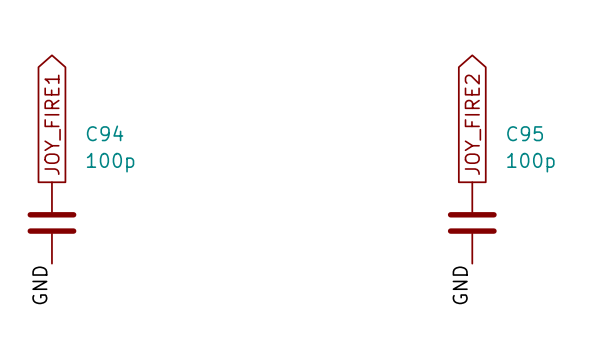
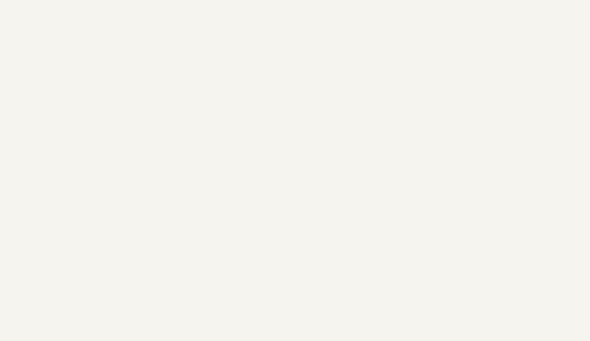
global label: JOY_FIRE1 (52, 124) -> none
global label: JOY_FIRE2 (472, 124) -> none
C94: 100p (51, 222) -> none
C95: 100p (472, 222) -> none
label: GND (39, 285) -> none
label: GND (460, 285) -> none

